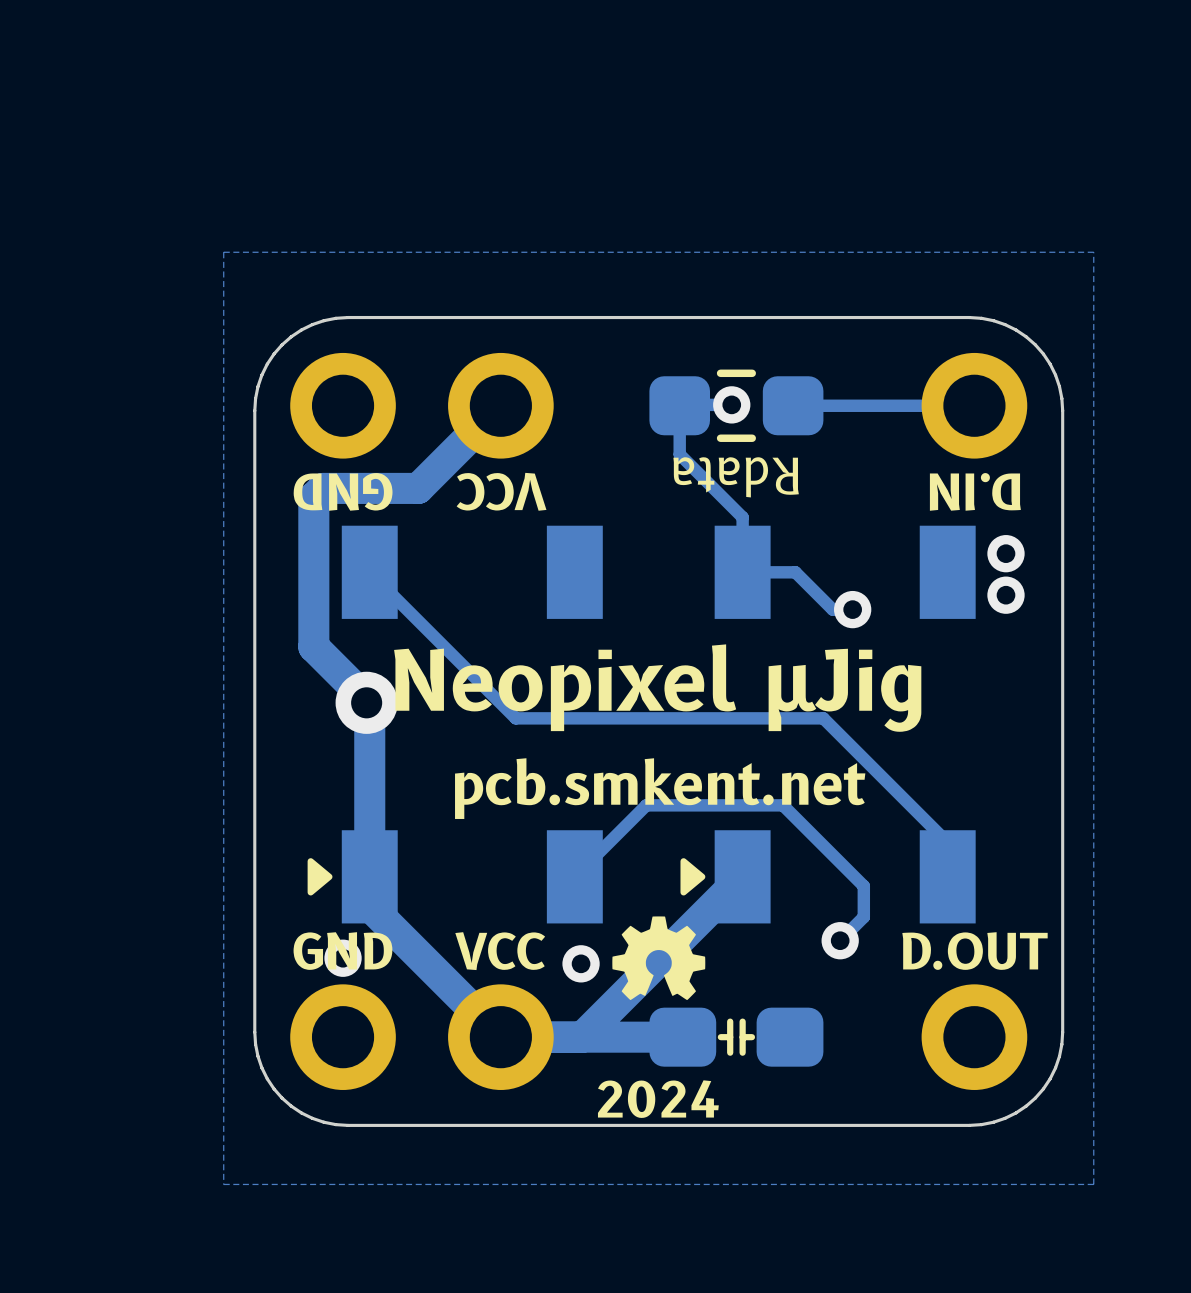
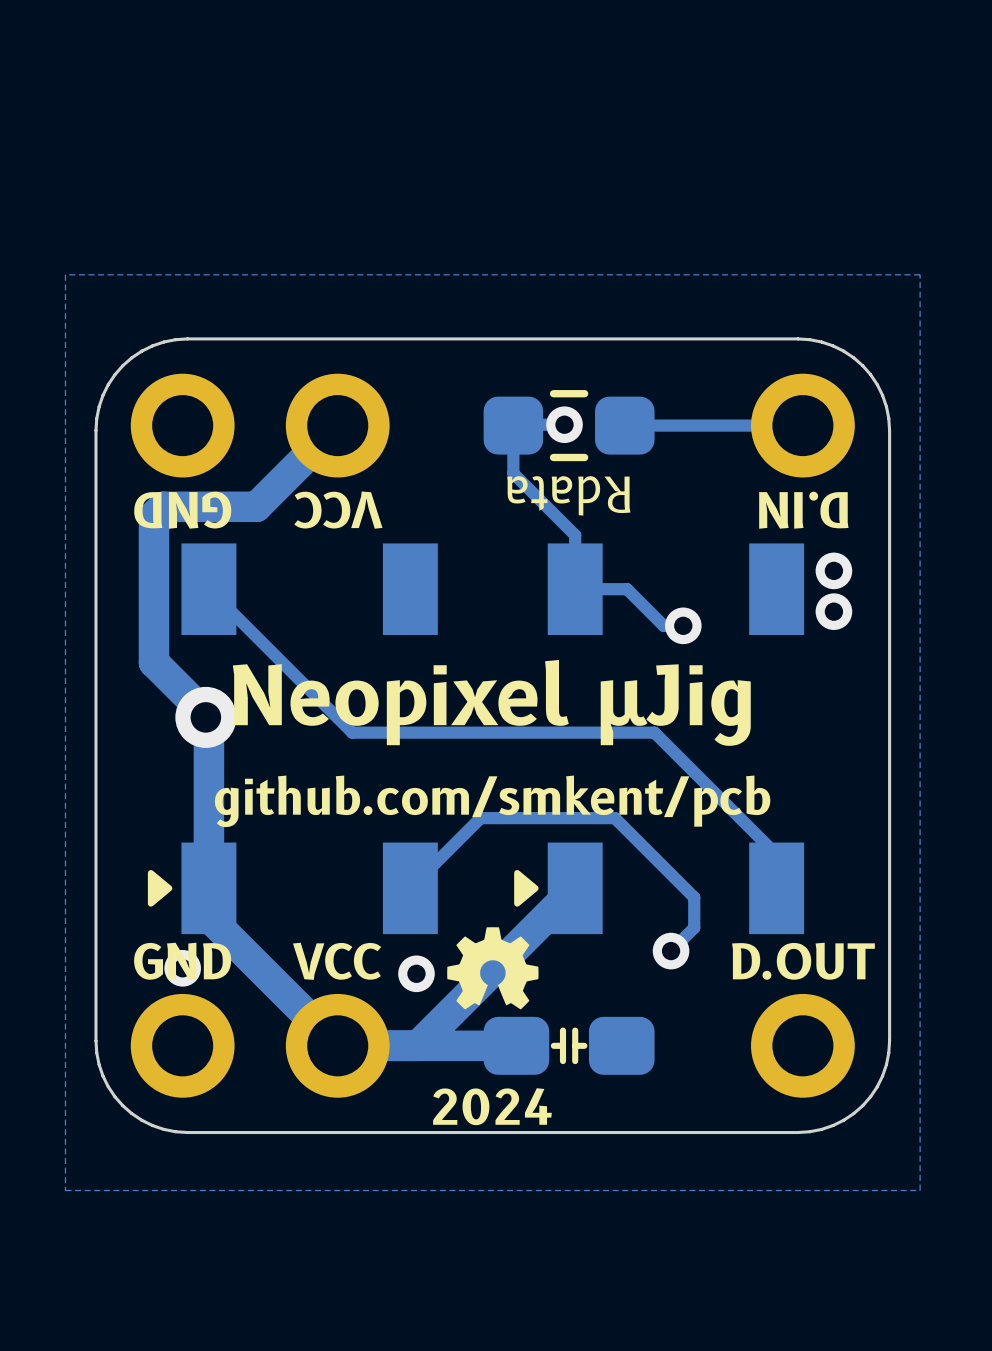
text: pcb.smkent.net (660, 788) -> github.com/smkent/pcb (492, 801)

